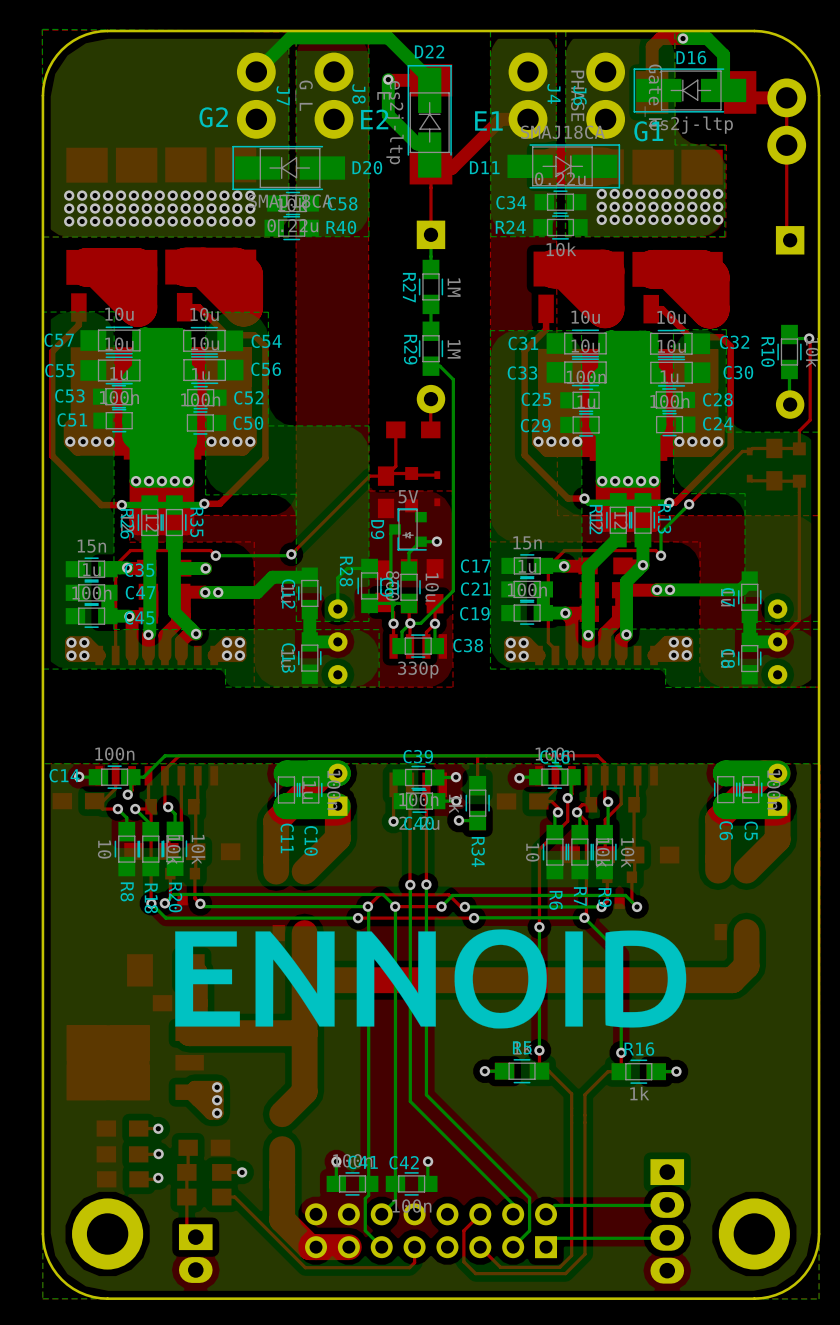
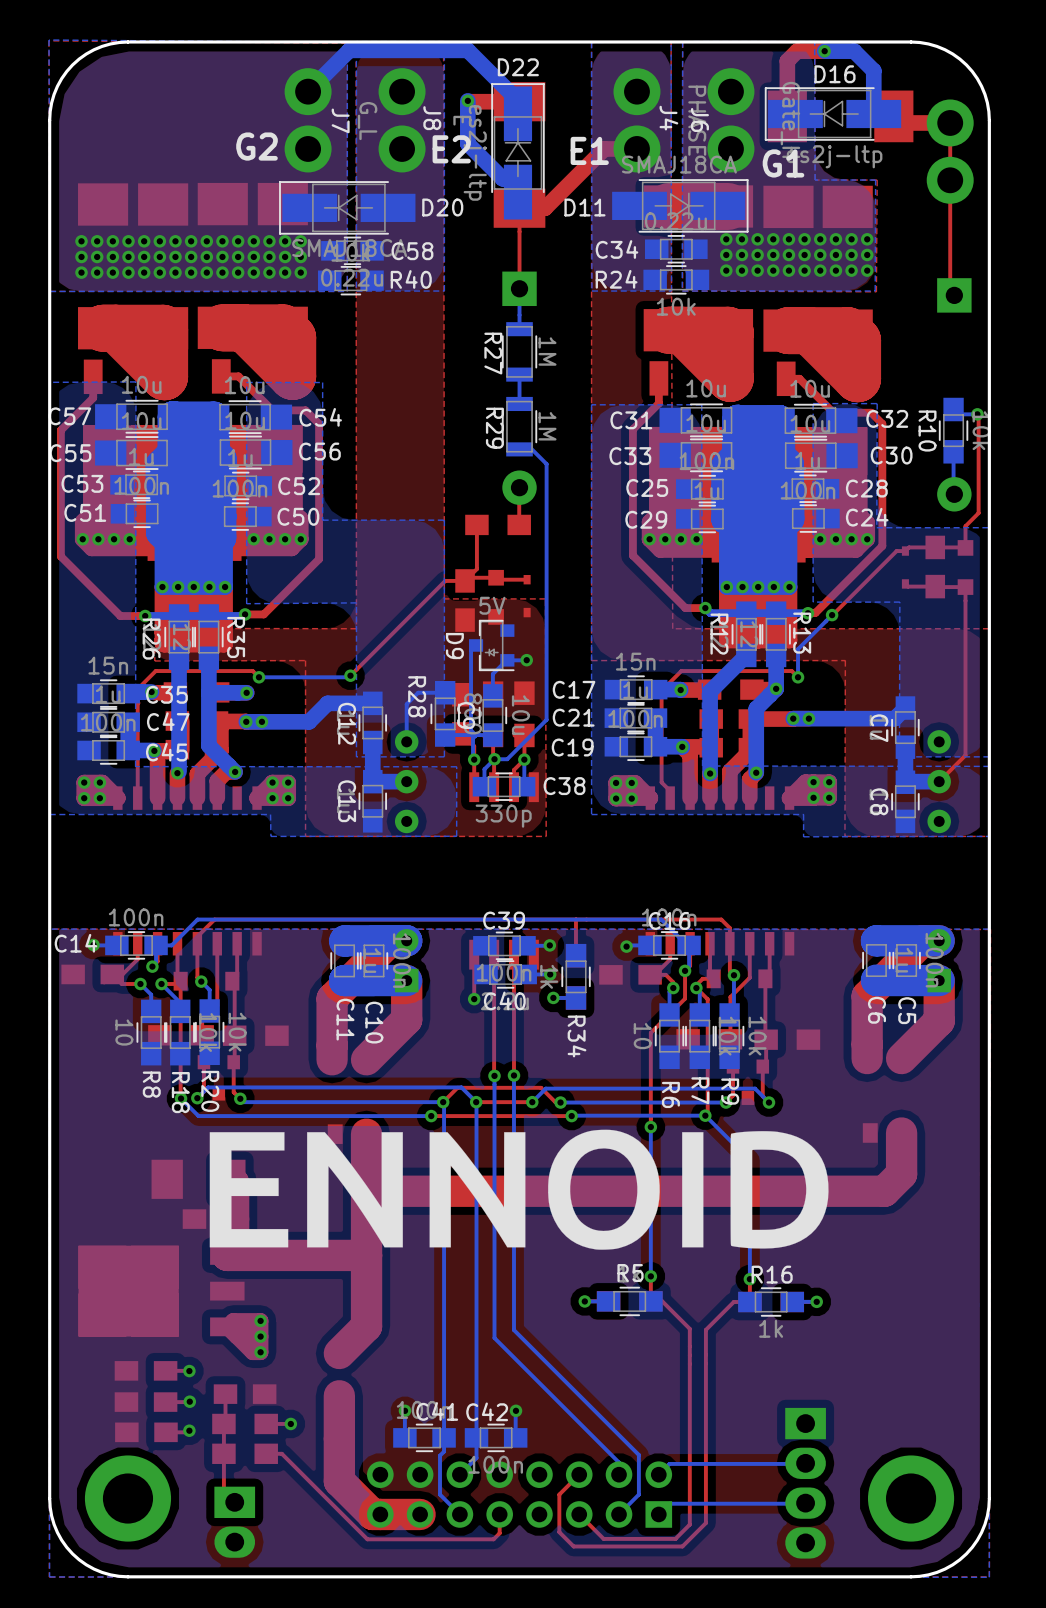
R27 footprint: [418, 259, 444, 315] -> [501, 322, 538, 382]
R29 footprint: [418, 321, 444, 376] -> [501, 396, 538, 457]

